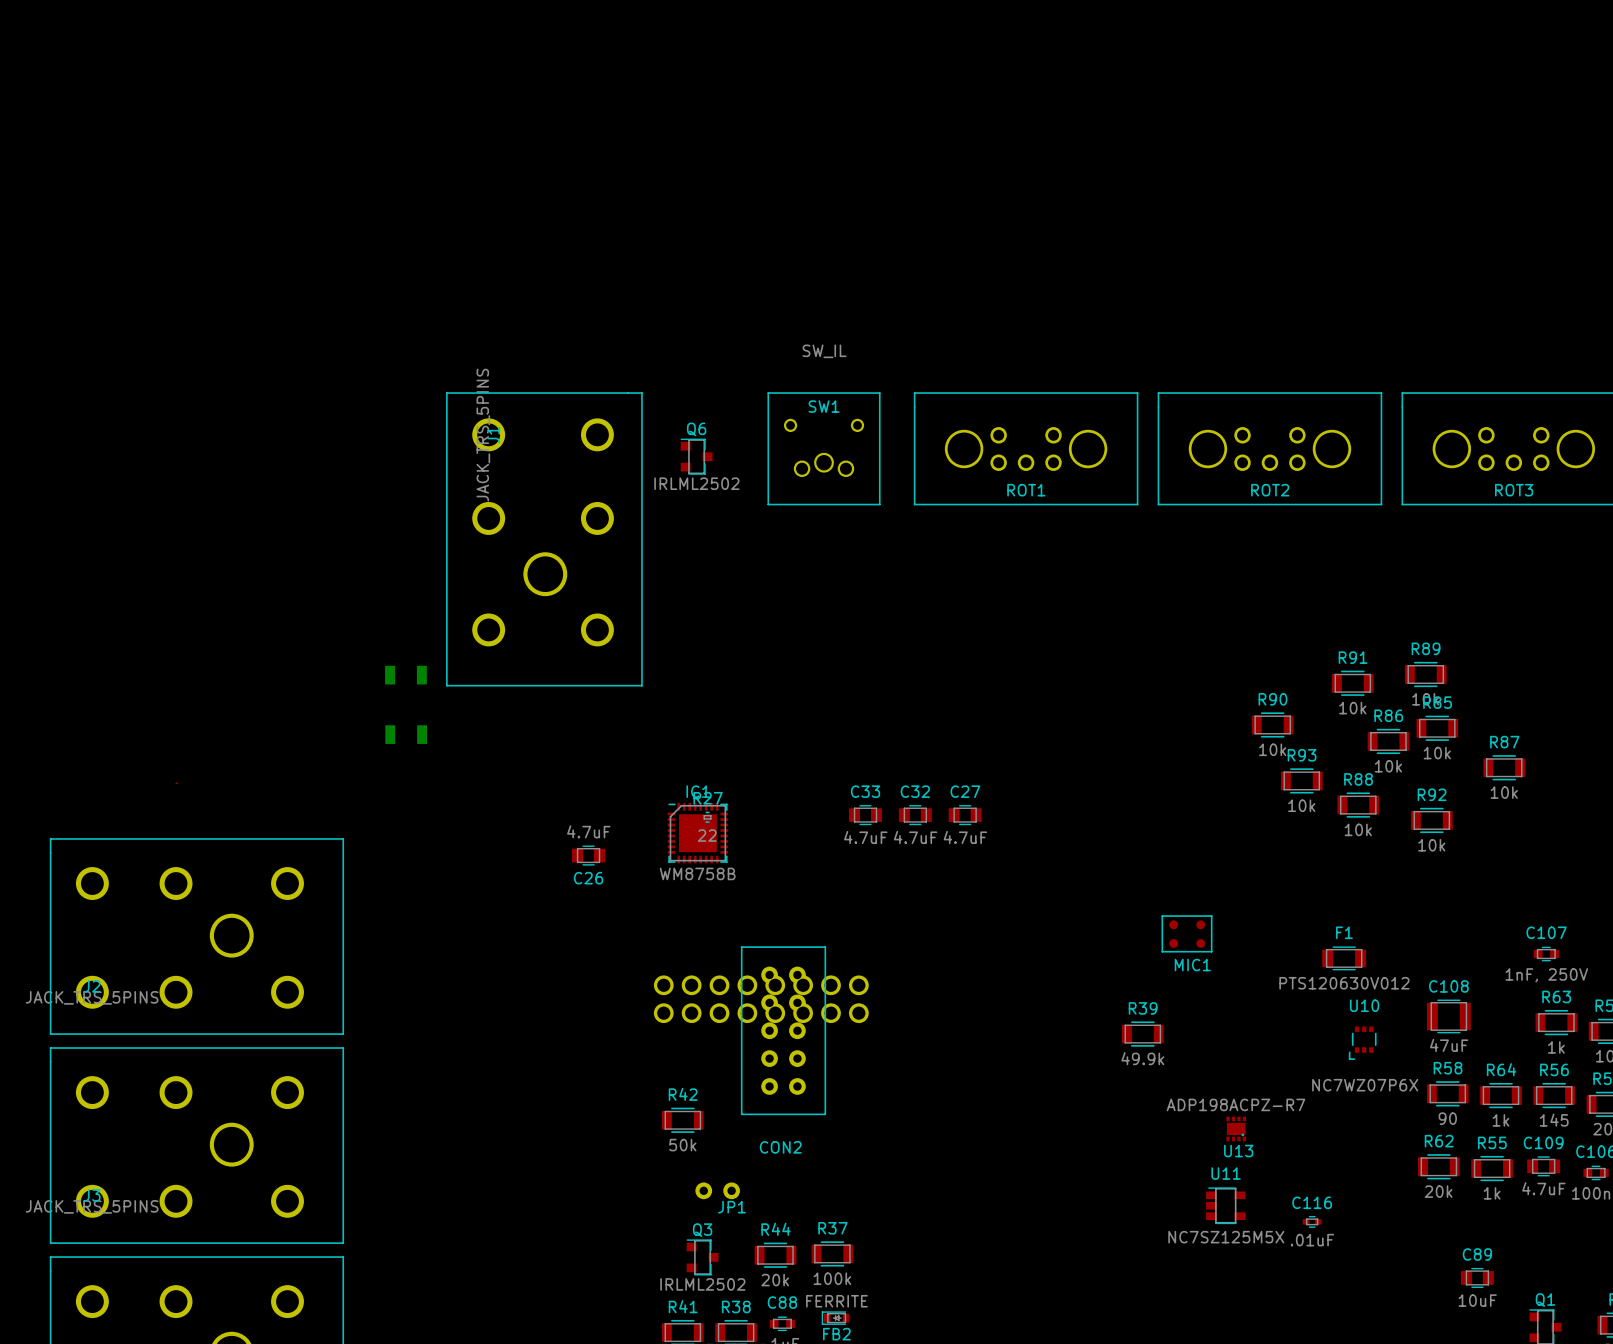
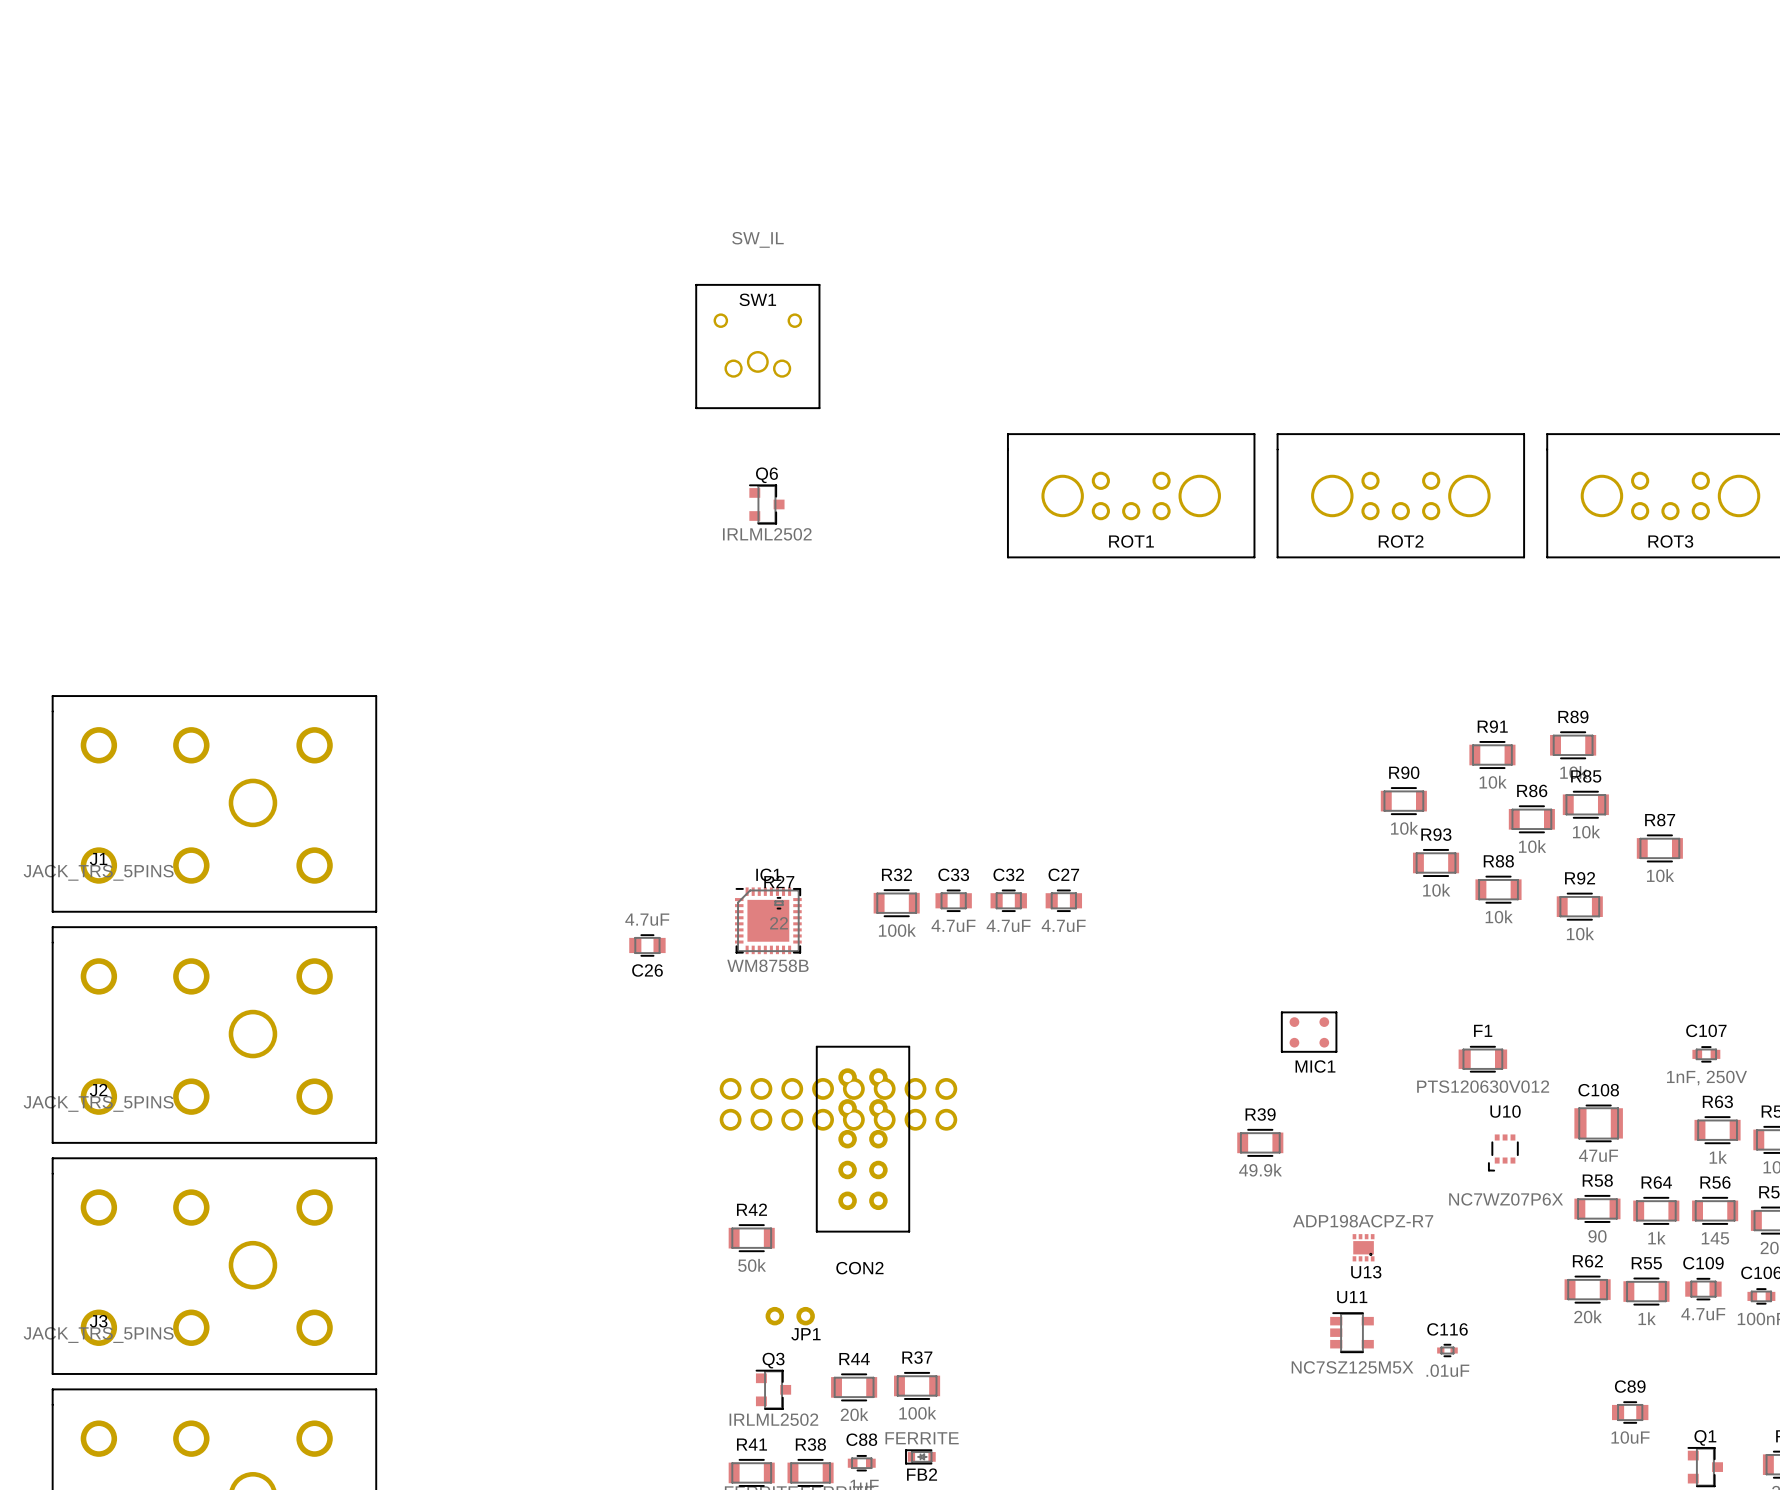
SW1 position: (824, 448) -> (757, 346)
J1 rotation: 0° (544, 539) -> 90° counterclockwise (214, 803)
J1 position: (544, 539) -> (214, 803)
part: (405, 675) -> none
part: (406, 734) -> none
R32: none -> 100k (896, 903)

